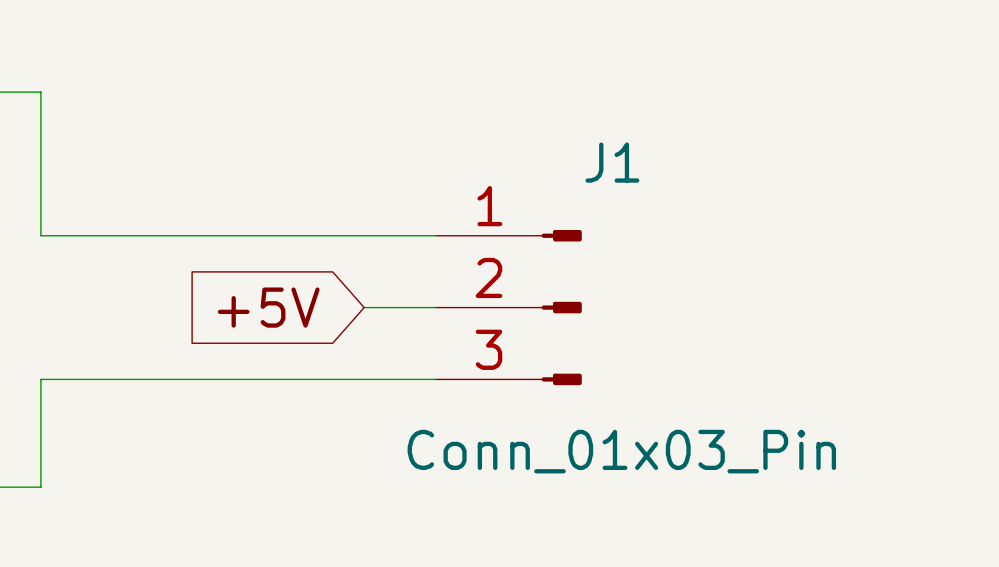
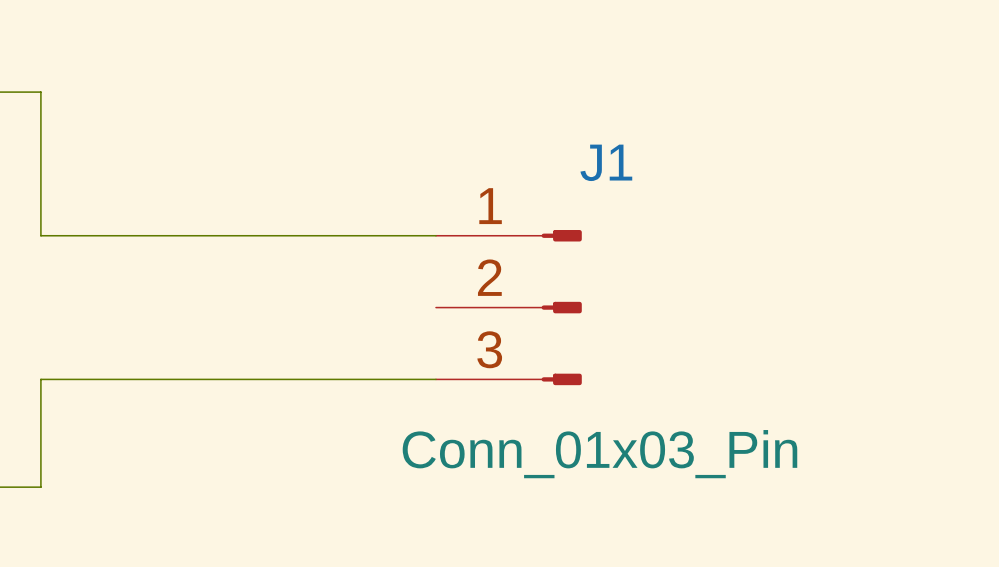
global label: +5V (268, 307) -> none
wire: (364, 307) (435, 307) -> none

